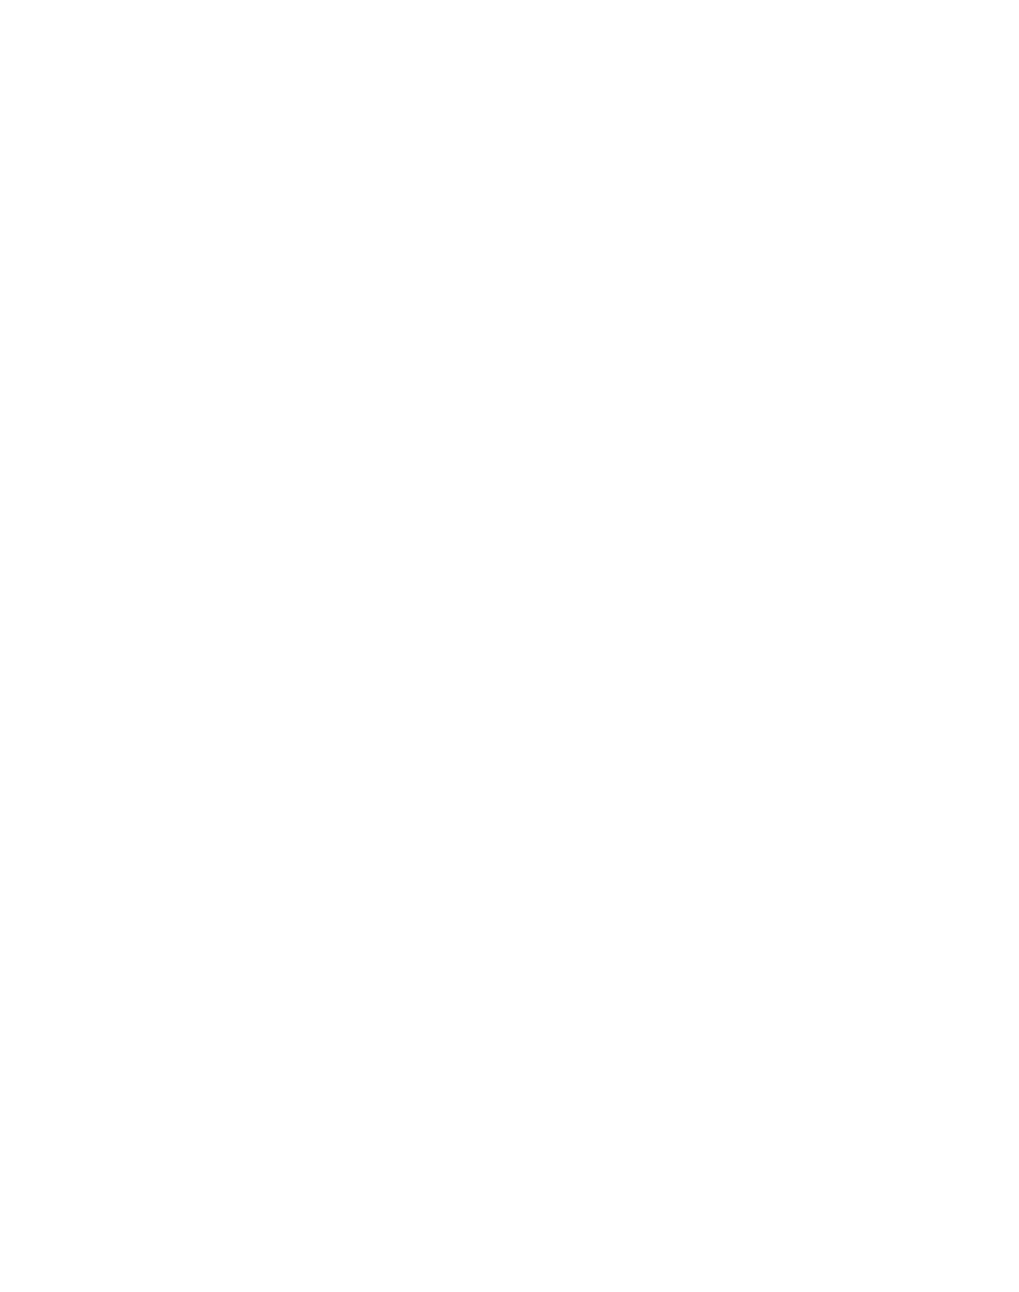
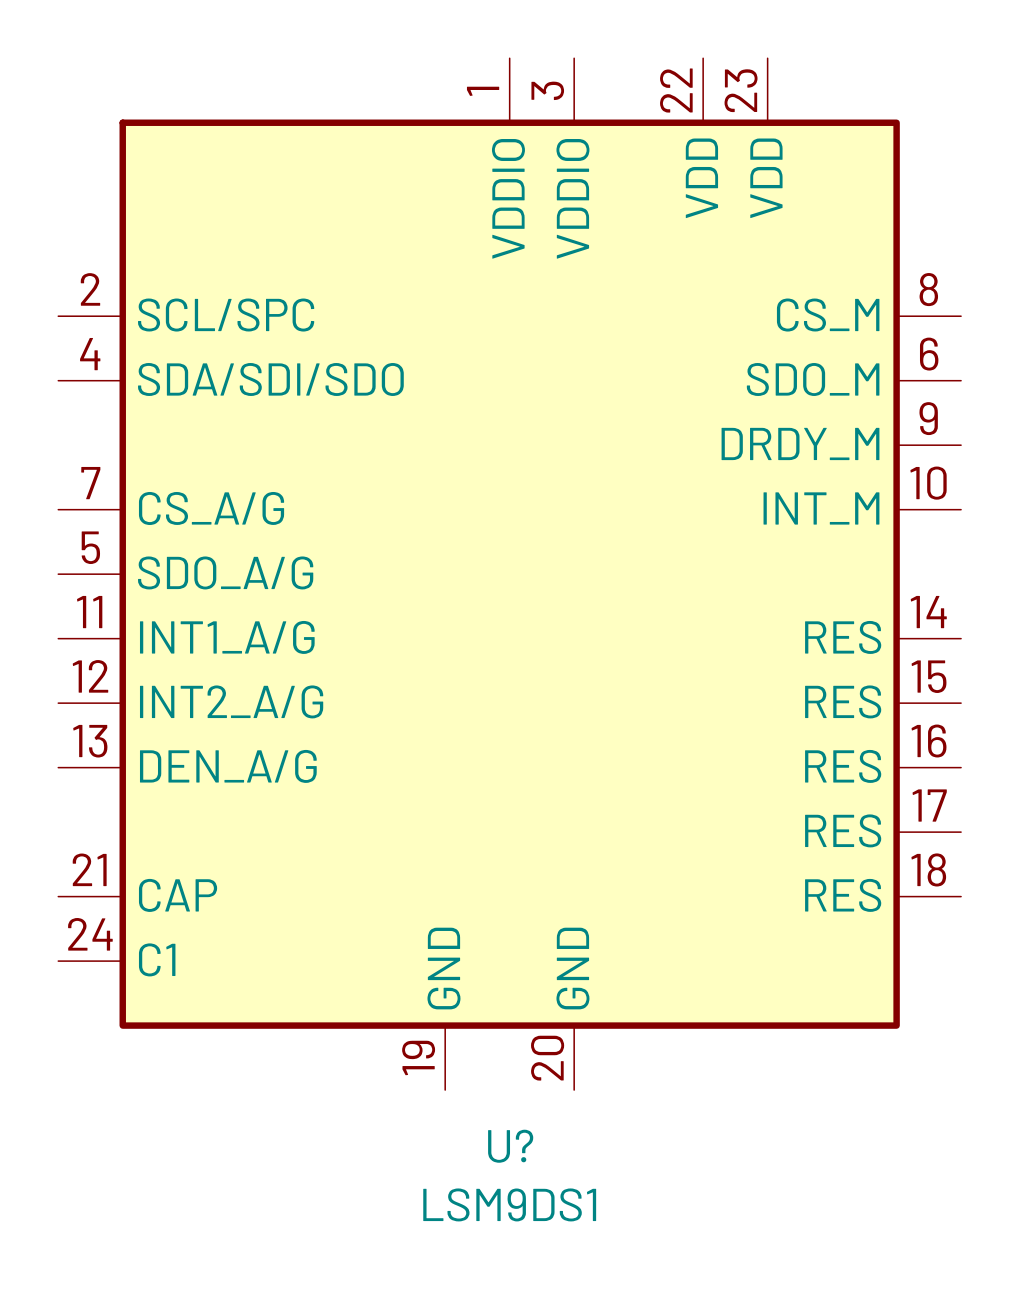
U?: none -> LSM9DS1 (509, 574)

